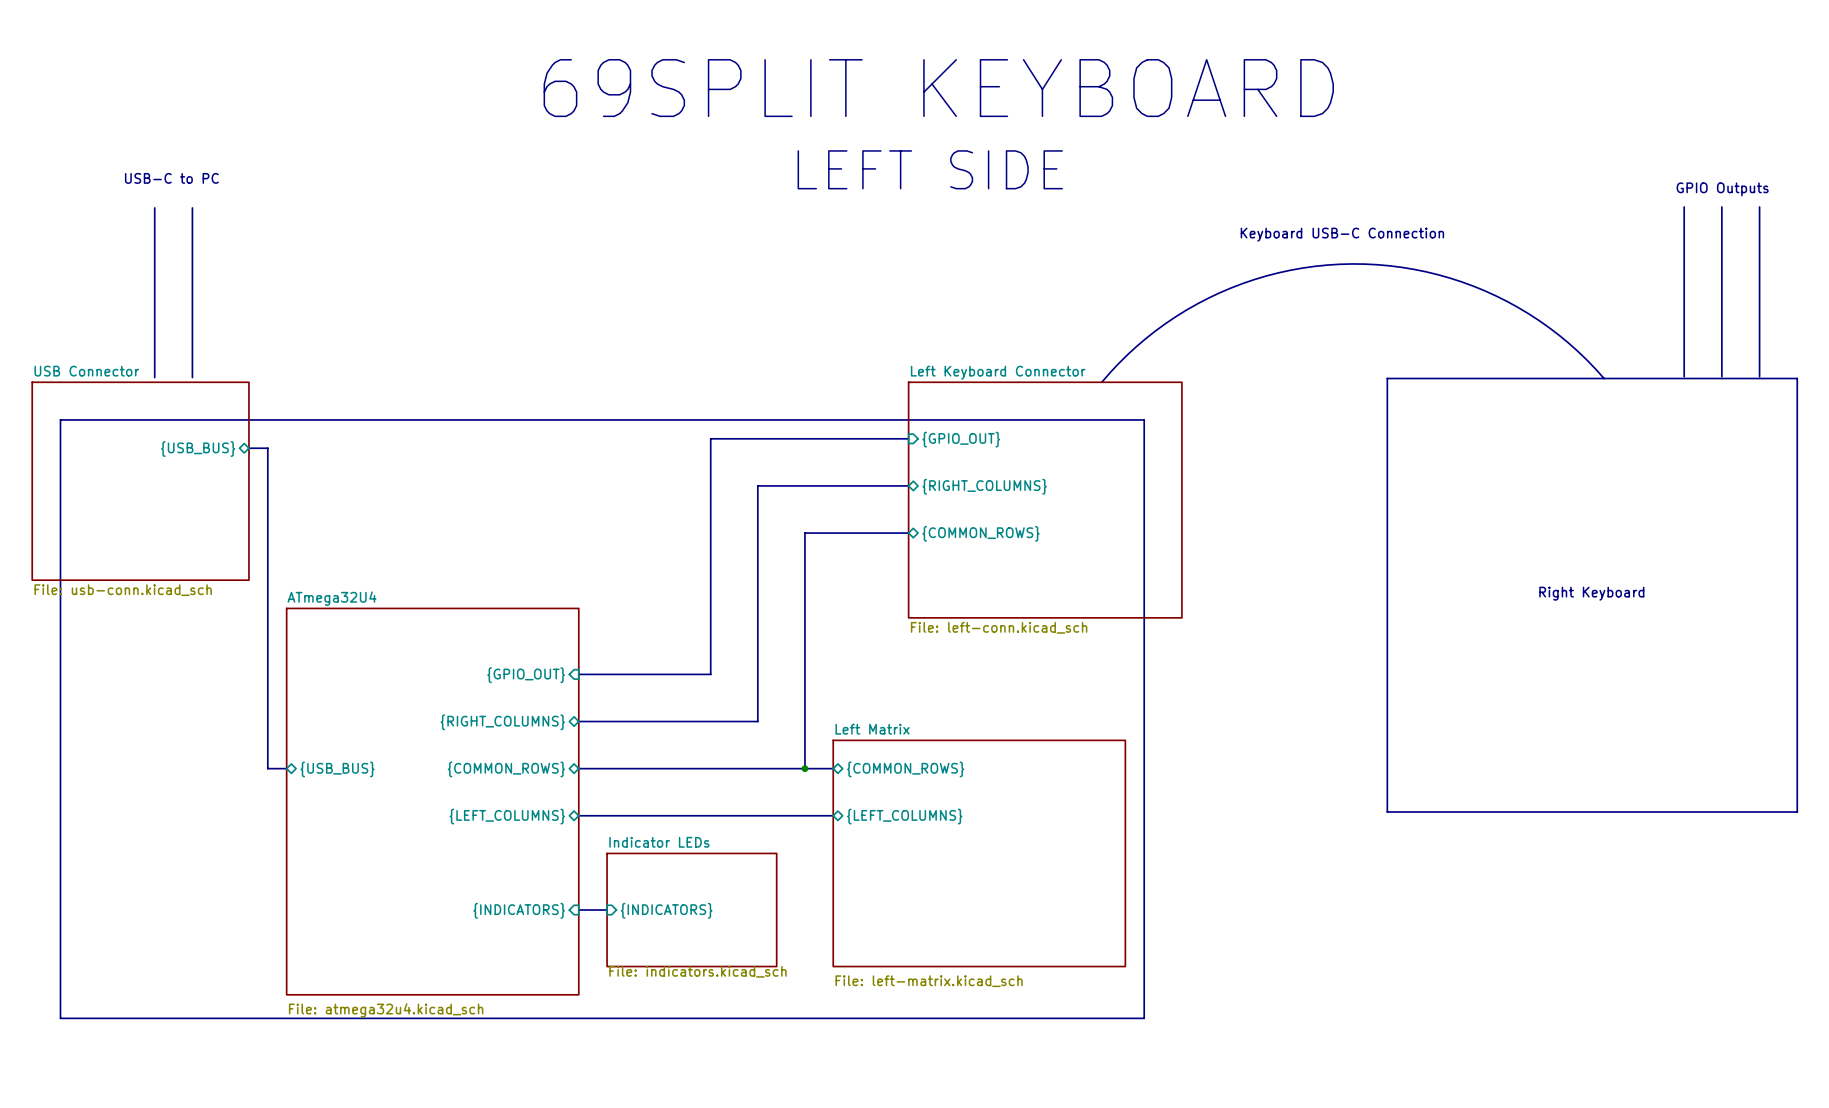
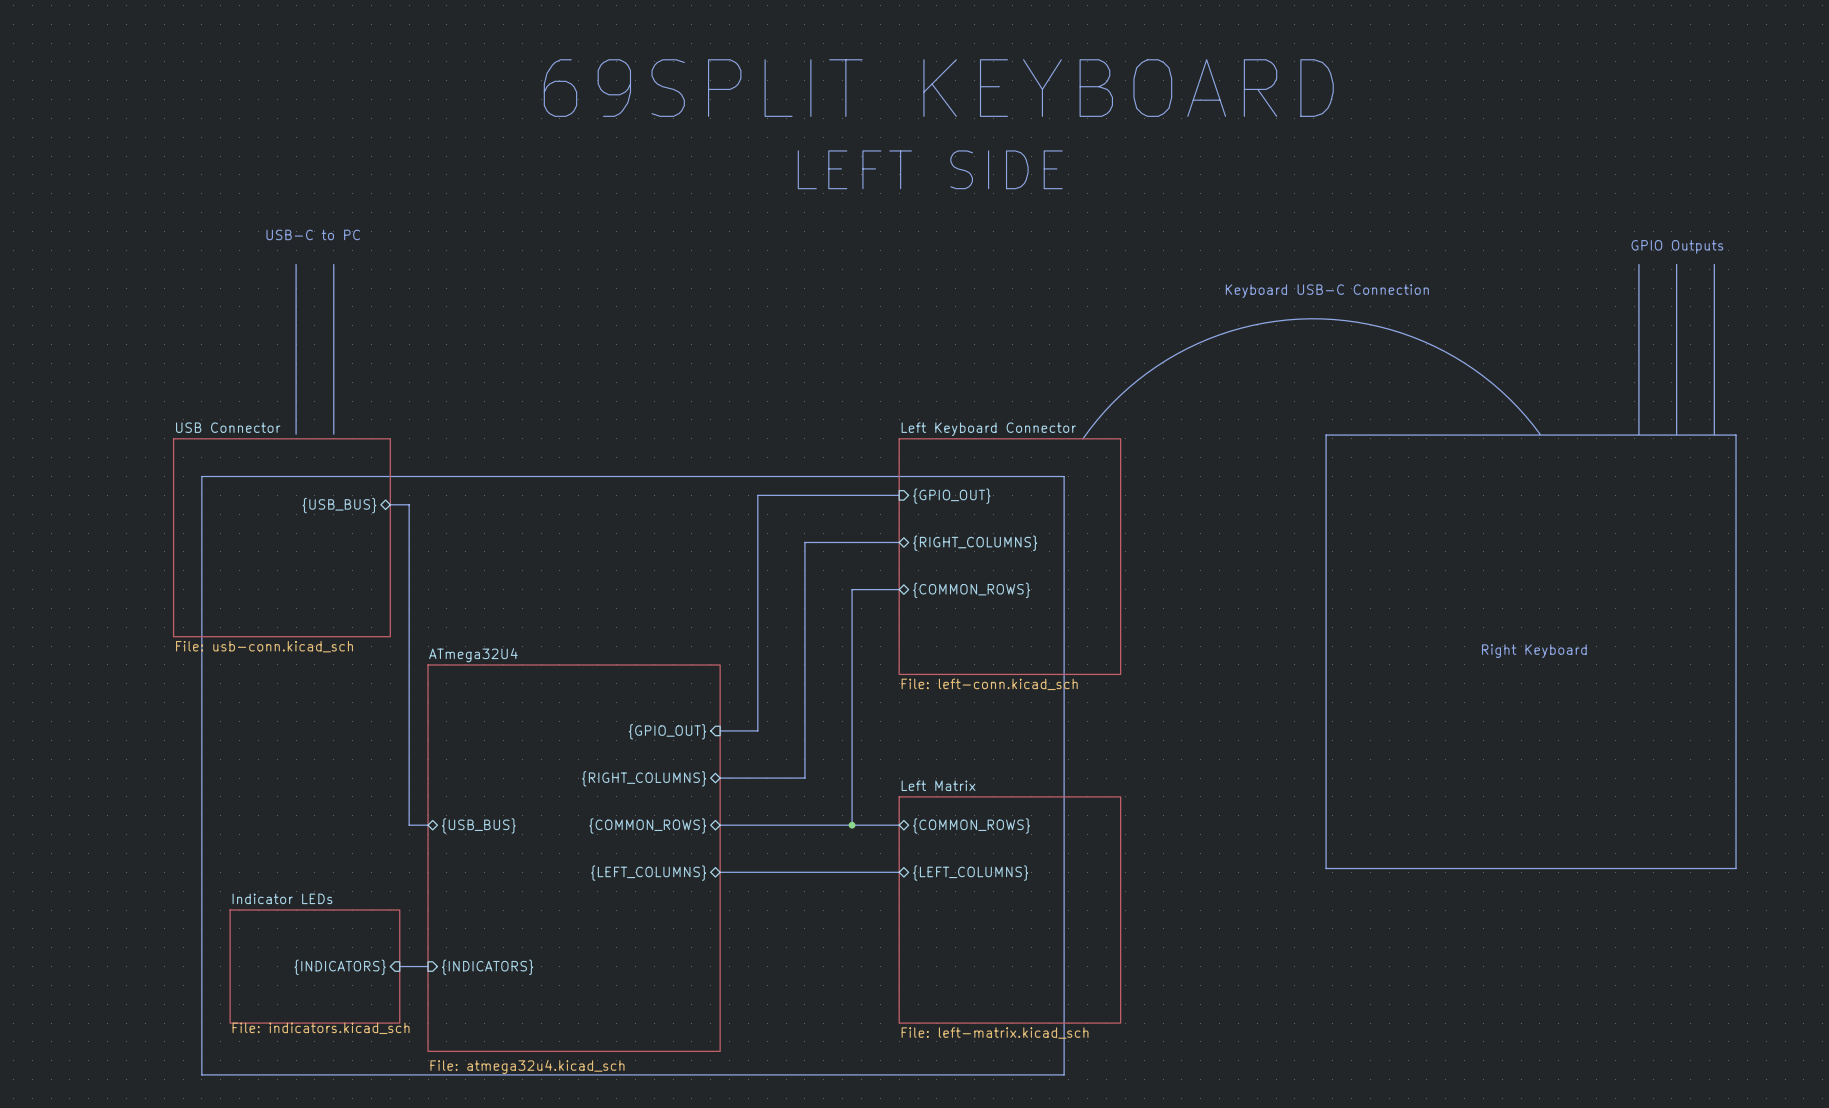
text position: USB-C to PC (171, 178) -> USB-C to PC (313, 234)
text position: GPIO Outputs (1722, 189) -> GPIO Outputs (1677, 246)
line: (154, 207) (154, 377) -> (296, 264) (296, 434)
line: (192, 207) (192, 377) -> (333, 264) (333, 434)
line: (1684, 207) (1684, 376) -> (1638, 264) (1638, 434)
line: (1721, 207) (1721, 376) -> (1676, 264) (1676, 434)
line: (1759, 207) (1759, 376) -> (1714, 264) (1714, 434)
text position: Keyboard USB-C Connection (1342, 234) -> Keyboard USB-C Connection (1327, 291)
line: (1387, 378) (1797, 378) (1797, 811) (1387, 811) (1387, 378) -> (1326, 435) (1736, 435) (1736, 868) (1326, 868) (1326, 435)
line: (1604, 378) (1578, 351) (1549, 327) (1518, 307) (1485, 290) (1426, 271) (1389, 265) (1352, 263) (1314, 266) (1278, 272) (1242, 283) (1208, 298) (1175, 316) (1145, 338) (1101, 382) -> none
line: (60, 419) (1144, 419) (1144, 1018) (60, 1018) (60, 419) -> (201, 476) (201, 1074) (1064, 1074) (1064, 476) (201, 476)
line: none -> (1539, 434) (1501, 391) (1473, 369) (1444, 351) (1412, 336) (1379, 326) (1345, 320) (1310, 318) (1275, 321) (1241, 328) (1187, 348) (1157, 366) (1129, 387) (1104, 411) (1082, 438)
bus: (908, 438) (710, 438) (710, 674) (578, 674) -> none
sheet pin position: {GPIO_OUT} (961, 439) -> {GPIO_OUT} (951, 496)
bus: (248, 448) (267, 448) (267, 768) (286, 768) -> (390, 504) (409, 504) (409, 825) (428, 825)
sheet pin: {USB_BUS} (198, 449) -> none
sheet USB Connector position: (140, 481) -> (281, 537)
bus: (908, 485) (757, 485) (757, 495) -> (899, 495) (757, 495)
sheet pin position: {RIGHT_COLUMNS} (984, 486) -> {RIGHT_COLUMNS} (975, 543)
sheet Left Keyboard Connector: File: left-conn.kicad_sch (1045, 500) -> none
sheet pin: none -> {USB_BUS} (339, 505)
bus: (908, 533) (804, 533) (804, 542) -> (899, 542) (804, 542)
sheet pin position: {COMMON_ROWS} (981, 533) -> {COMMON_ROWS} (971, 590)
sheet Left Keyboard Connector: none -> File: left-conn.kicad_sch (1009, 556)
bus: none -> (899, 589) (852, 589) (852, 825)
text position: Right Keyboard (1591, 593) -> Right Keyboard (1534, 651)
sheet pin position: {GPIO_OUT} (526, 675) -> {GPIO_OUT} (667, 731)
bus: (578, 721) (757, 721) -> (720, 730) (757, 730) (757, 721)
sheet pin position: {RIGHT_COLUMNS} (502, 722) -> {RIGHT_COLUMNS} (644, 778)
bus: (578, 768) (833, 768) -> none
bus: none -> (804, 768) (804, 778) (720, 778)
junction: (804, 768) -> none
sheet pin: {USB_BUS} (337, 769) -> none
sheet pin: {COMMON_ROWS} (506, 769) -> none
sheet pin: {COMMON_ROWS} (905, 769) -> none
sheet ATmega32U4 position: (432, 801) -> (574, 858)
bus: (578, 815) (833, 815) -> none
sheet pin: {LEFT_COLUMNS} (507, 816) -> none
sheet pin: {LEFT_COLUMNS} (904, 816) -> none
sheet pin: none -> {USB_BUS} (478, 825)
sheet pin: none -> {COMMON_ROWS} (647, 825)
bus: none -> (720, 825) (899, 825)
junction: none -> (852, 825)
sheet pin: none -> {COMMON_ROWS} (971, 825)
sheet Left Matrix: File: left-matrix.kicad_sch (979, 853) -> none
bus: none -> (720, 872) (899, 872)
sheet pin: none -> {LEFT_COLUMNS} (648, 873)
sheet pin: none -> {LEFT_COLUMNS} (970, 873)
sheet pin: {INDICATORS} (519, 910) -> none
bus: (578, 910) (607, 910) -> none
sheet pin: {INDICATORS} (666, 910) -> none
sheet Indicator LEDs: File: indicators.kicad_sch (691, 910) -> none
sheet Left Matrix: none -> File: left-matrix.kicad_sch (1009, 910)
sheet Indicator LEDs: none -> File: indicators.kicad_sch (314, 966)
bus: none -> (399, 966) (428, 966)
sheet pin: none -> {INDICATORS} (340, 967)
sheet pin: none -> {INDICATORS} (487, 967)

